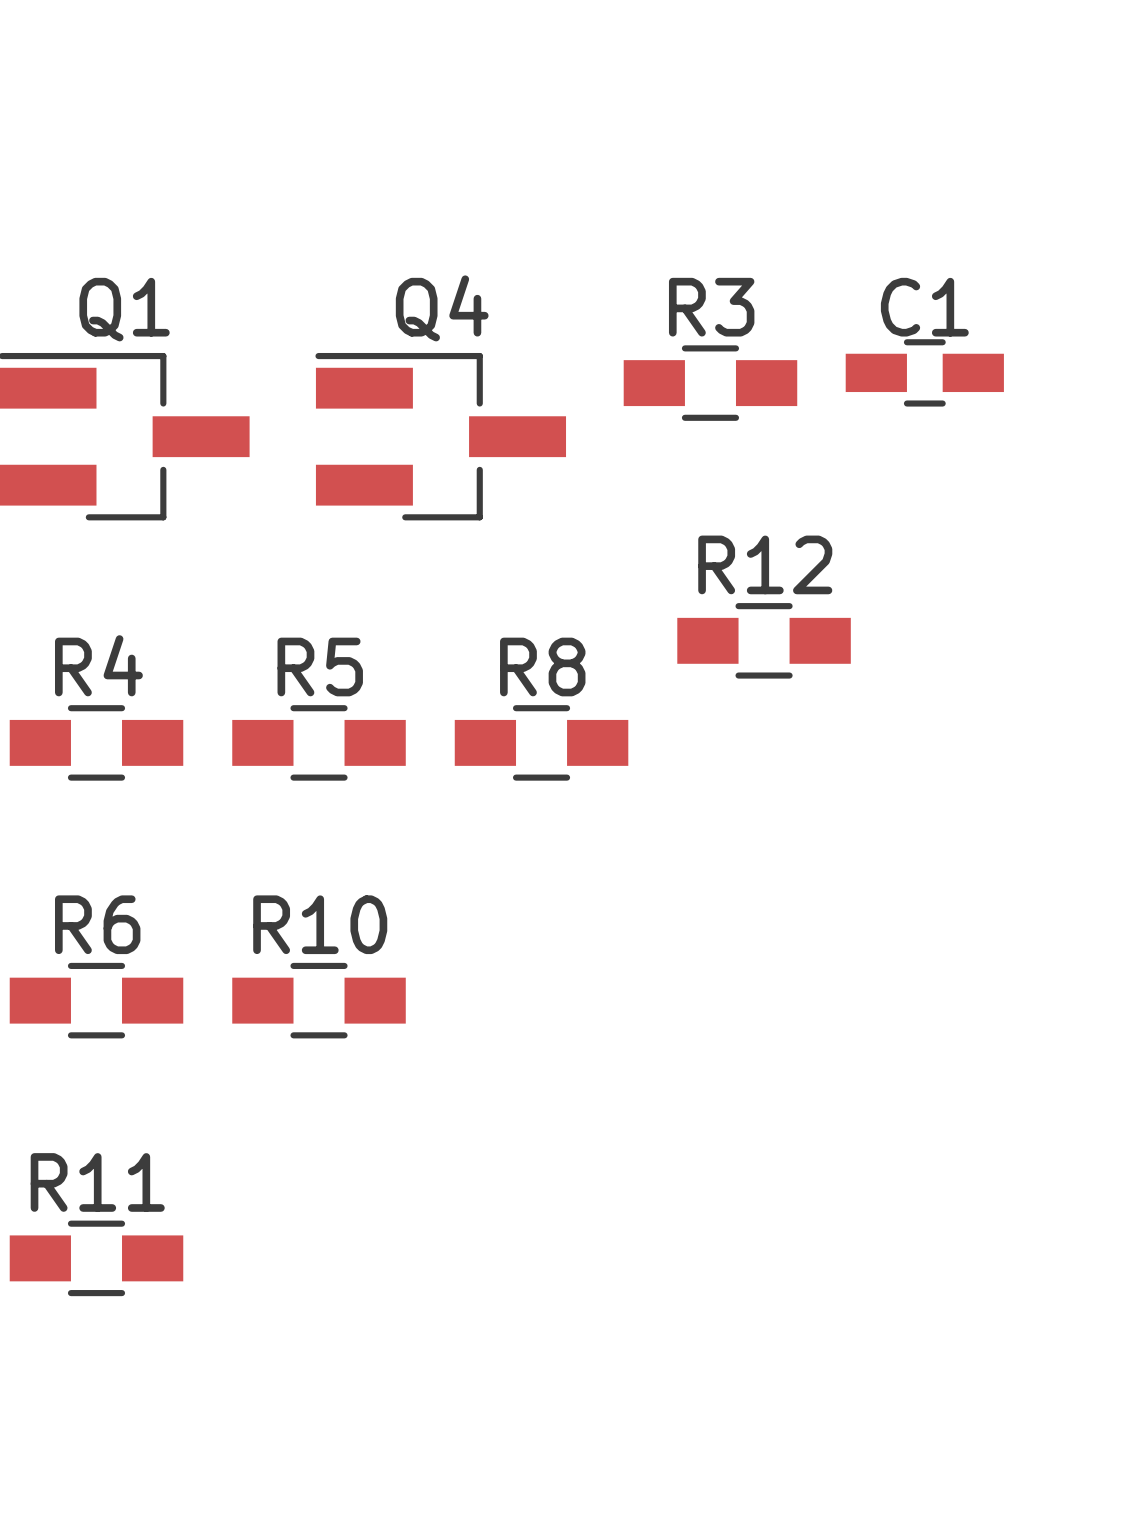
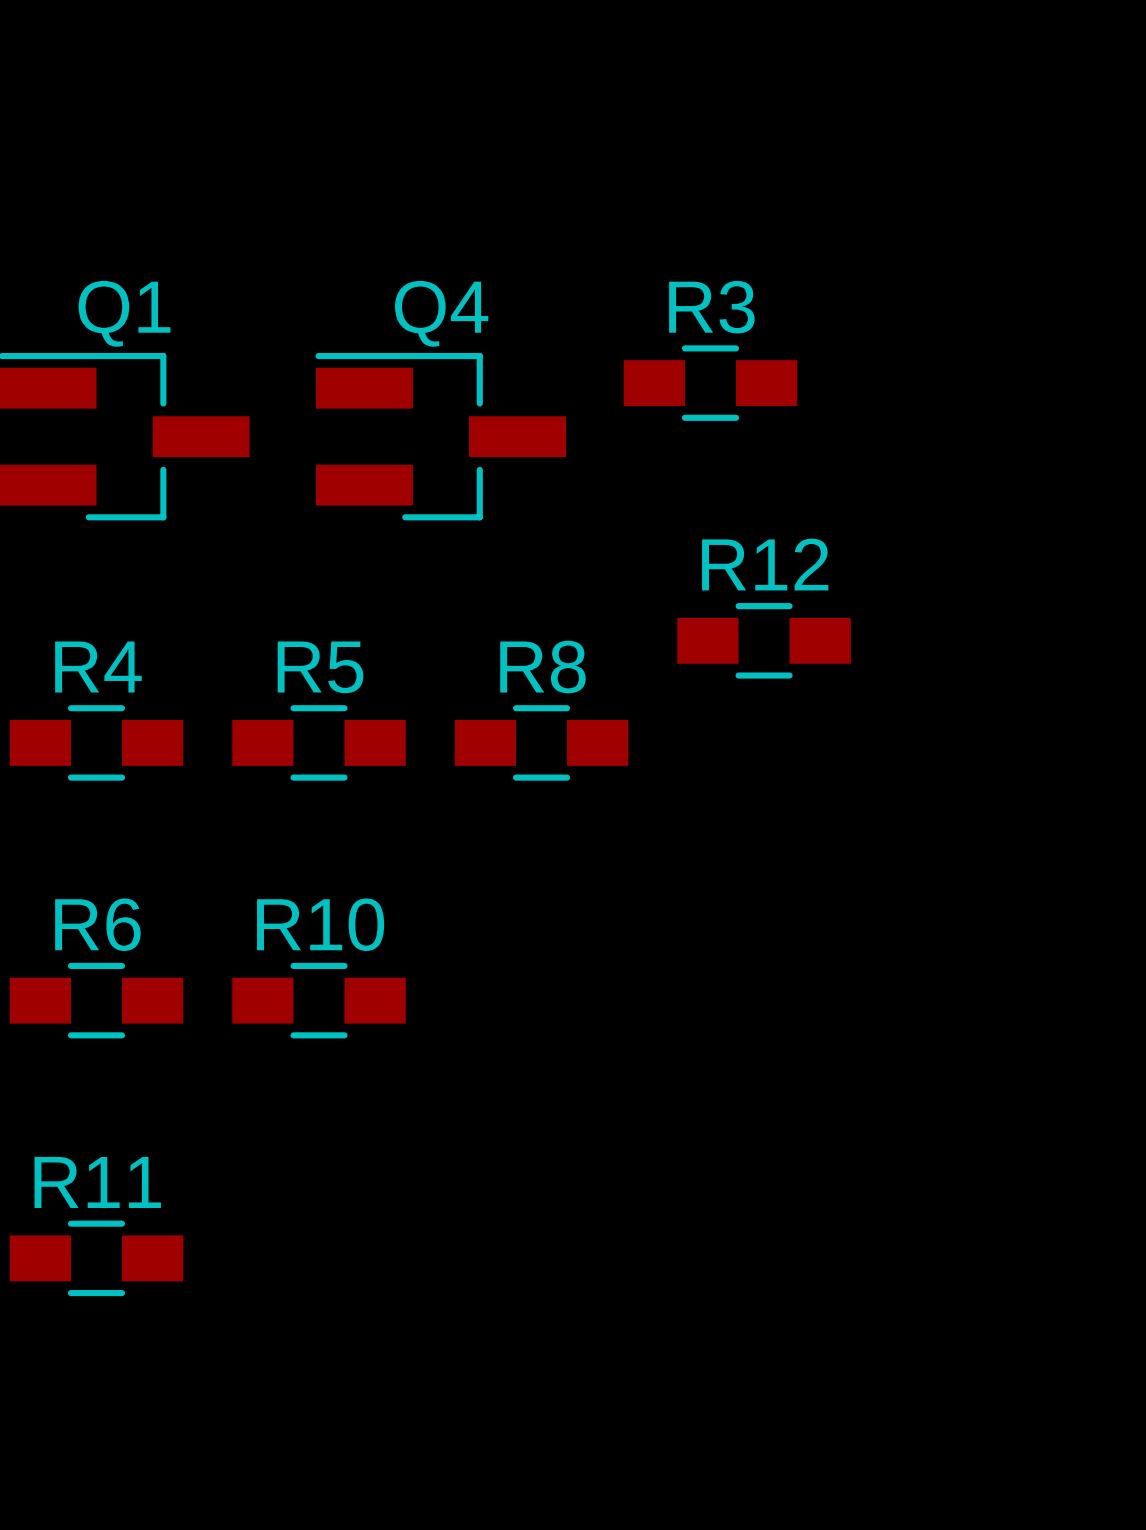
C1: (924, 372) -> none

